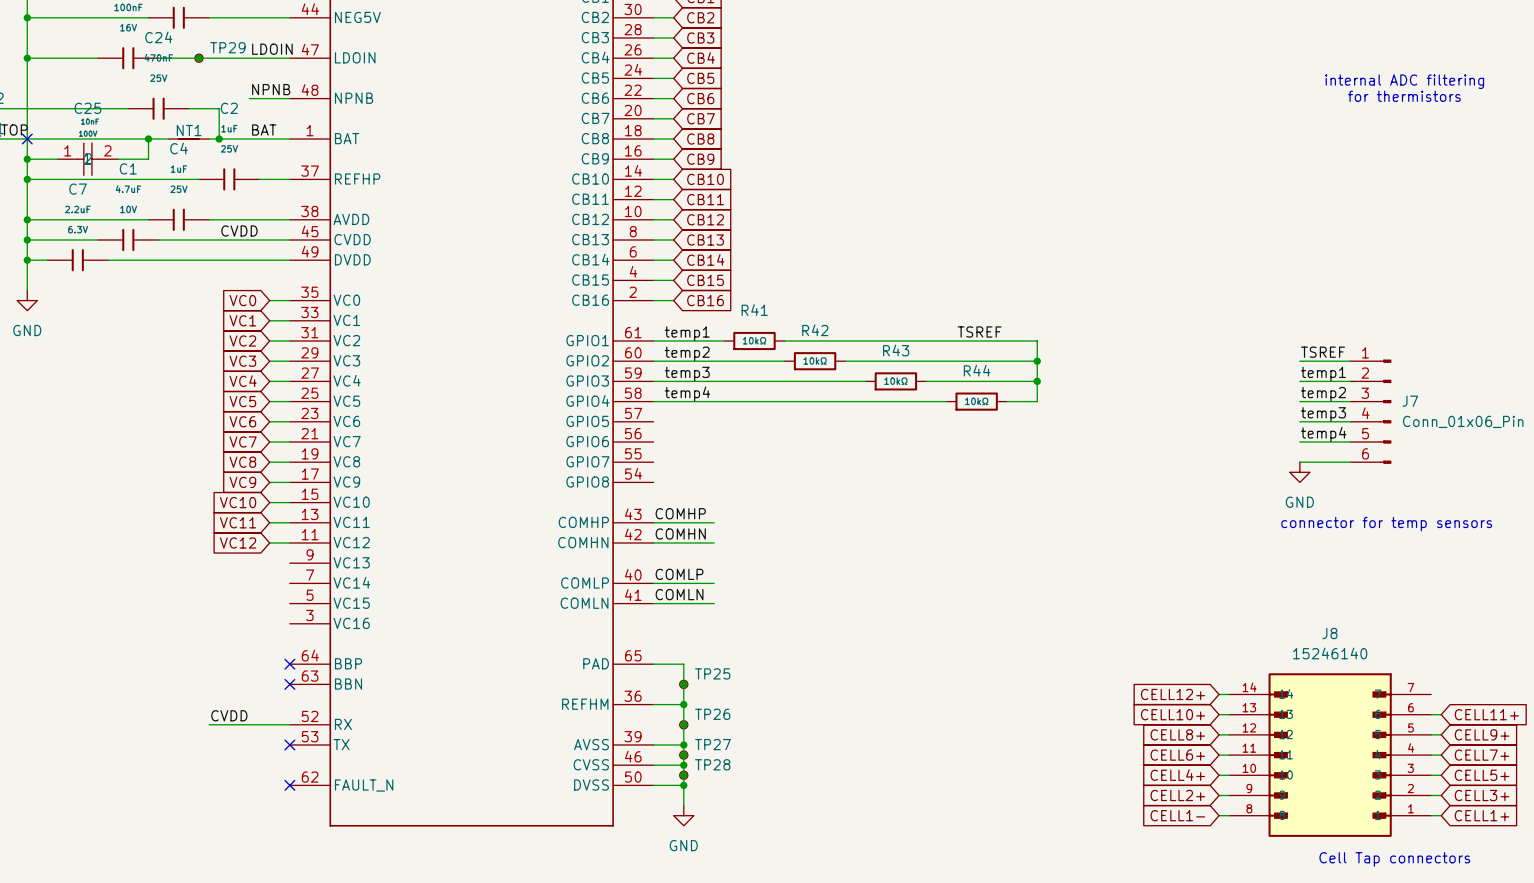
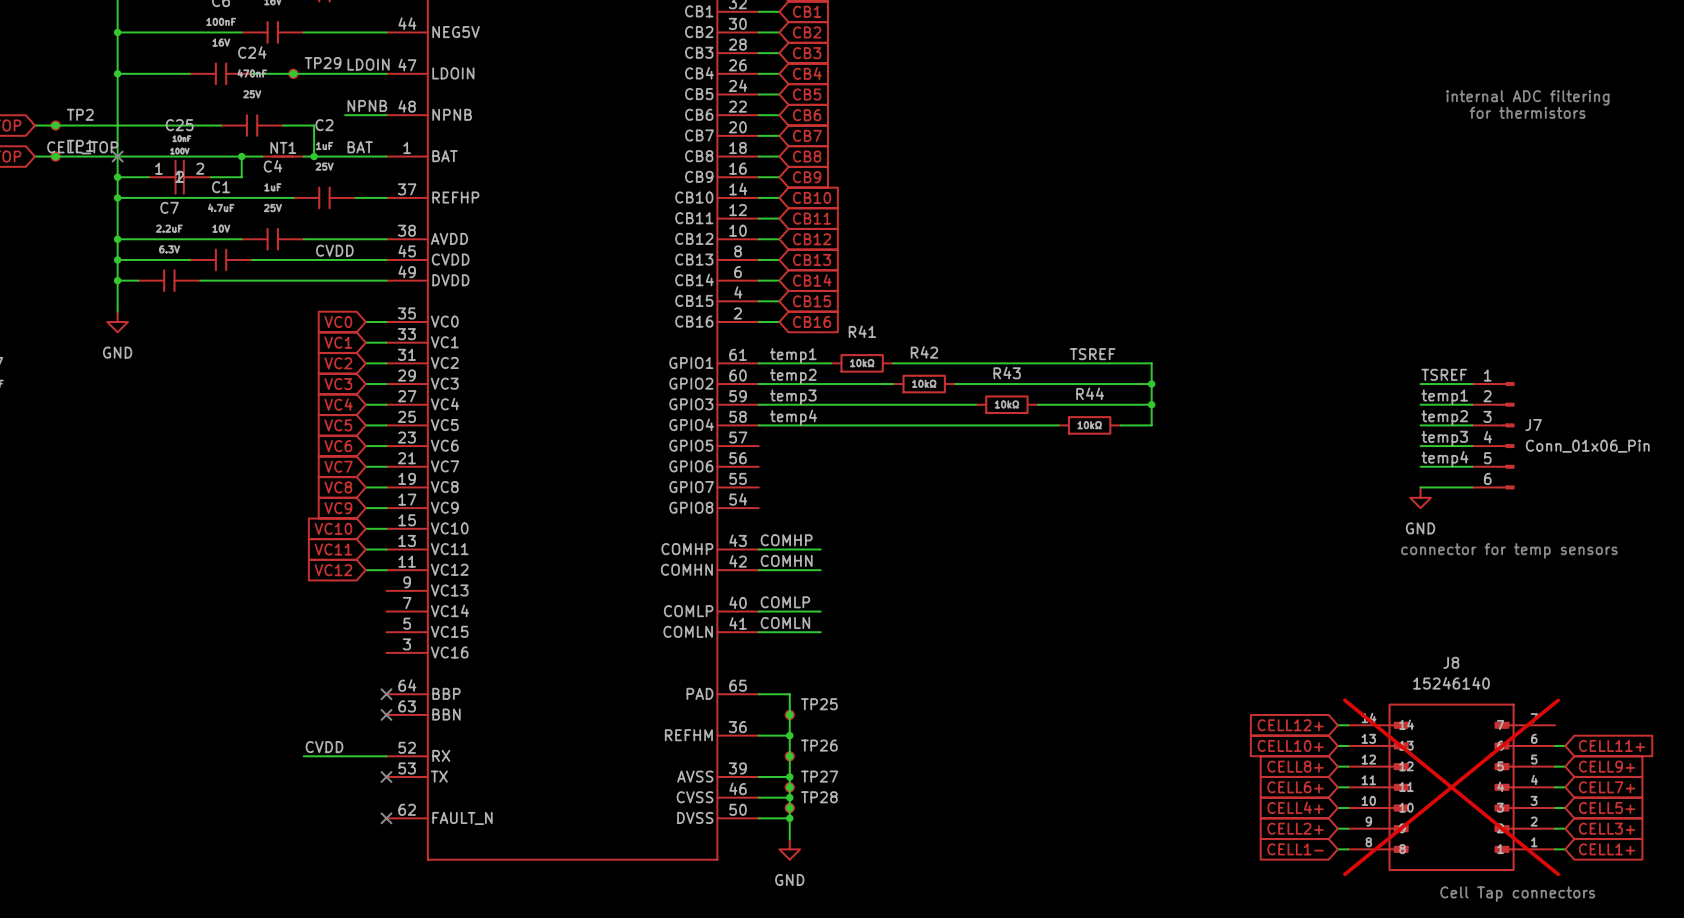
J8 do-not-place cross: none -> (1451, 787)

